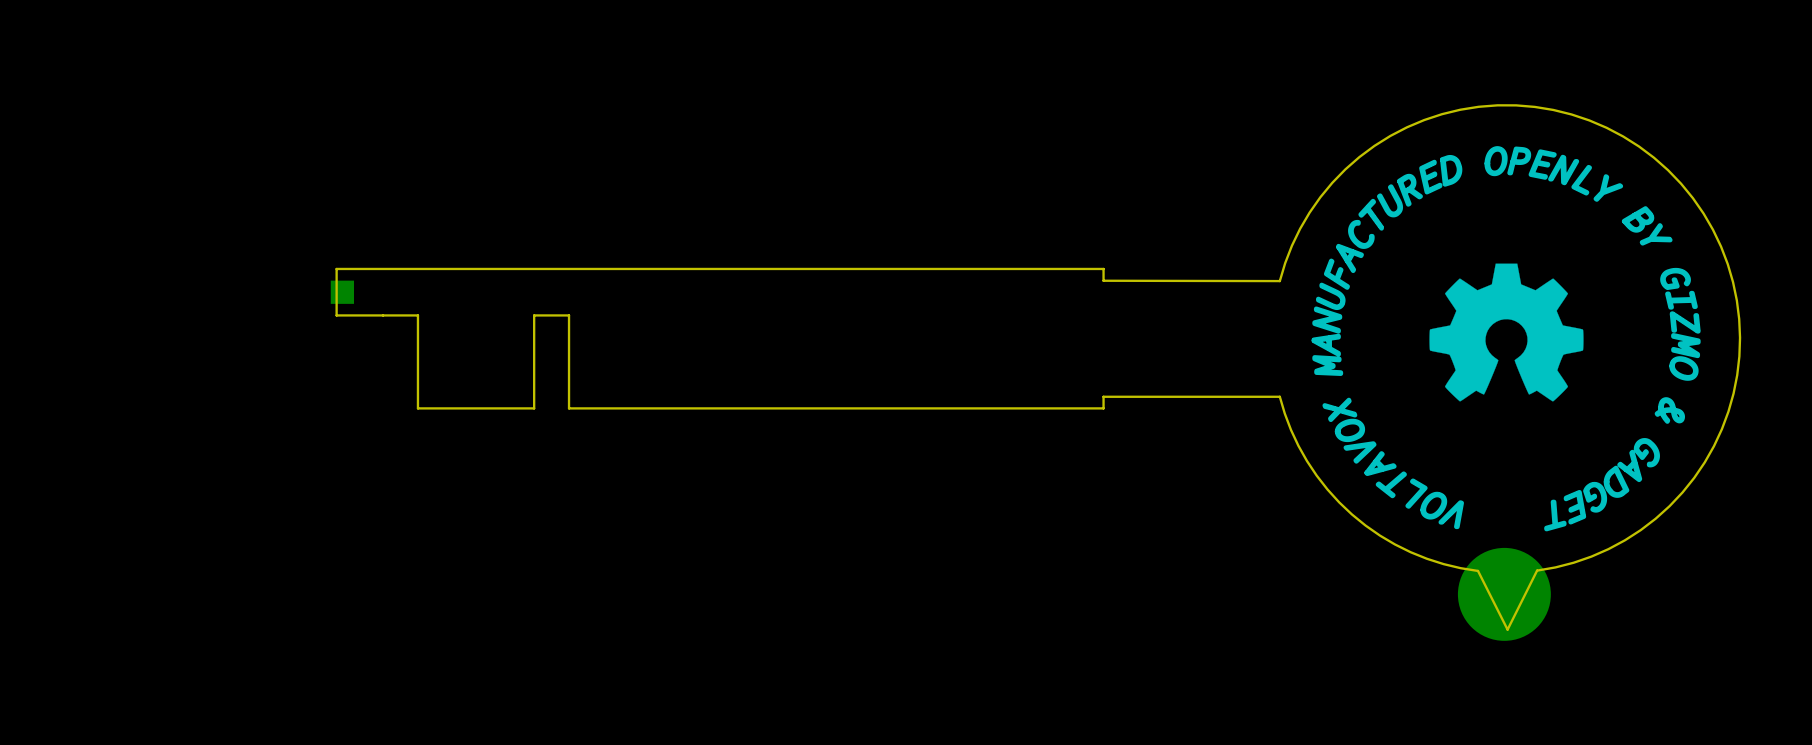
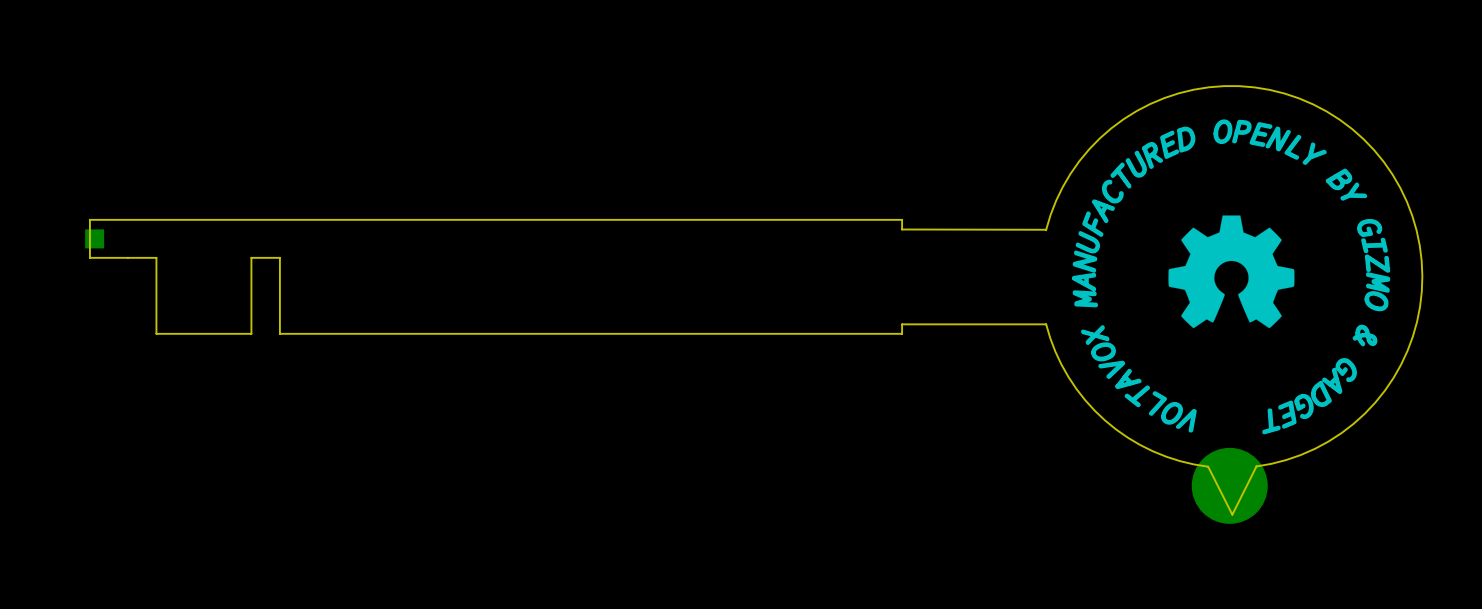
board edge: (336, 268) (336, 315) -> (275, 219) (89, 219) (89, 257) (156, 257) (156, 333) (251, 333) (251, 257) (275, 257)
part position: (342, 292) -> (94, 238)
board edge: (342, 315) (417, 315) (417, 408) -> (279, 257) (279, 333) (341, 333)
board edge: (569, 408) (569, 315) (534, 315) (534, 408) -> (465, 333) (436, 333)

